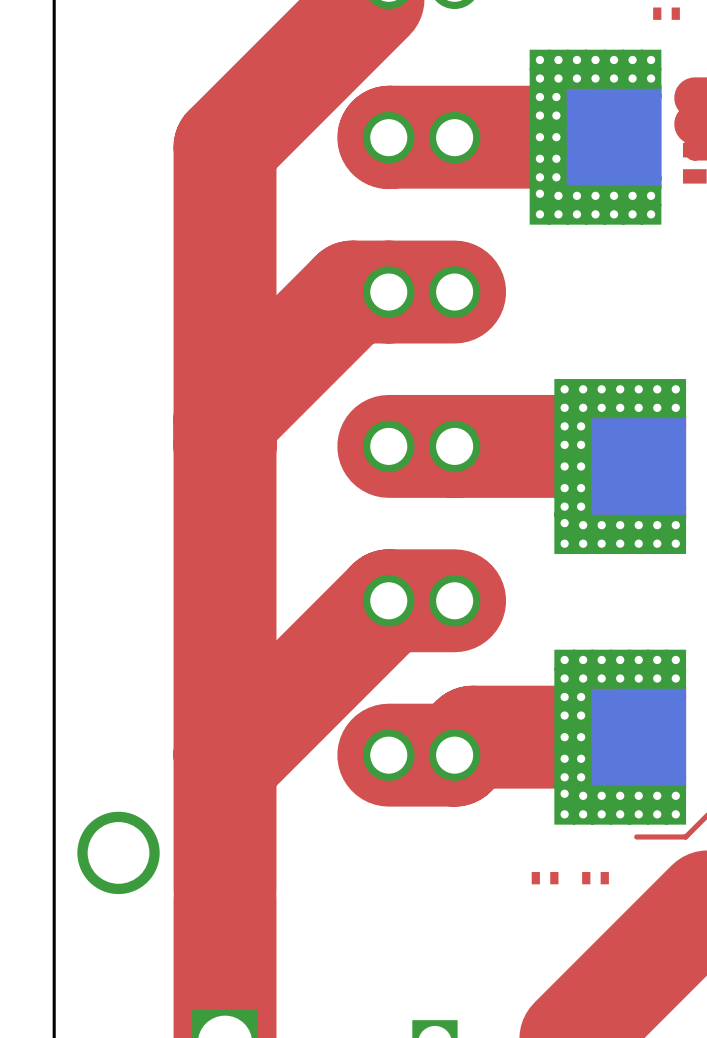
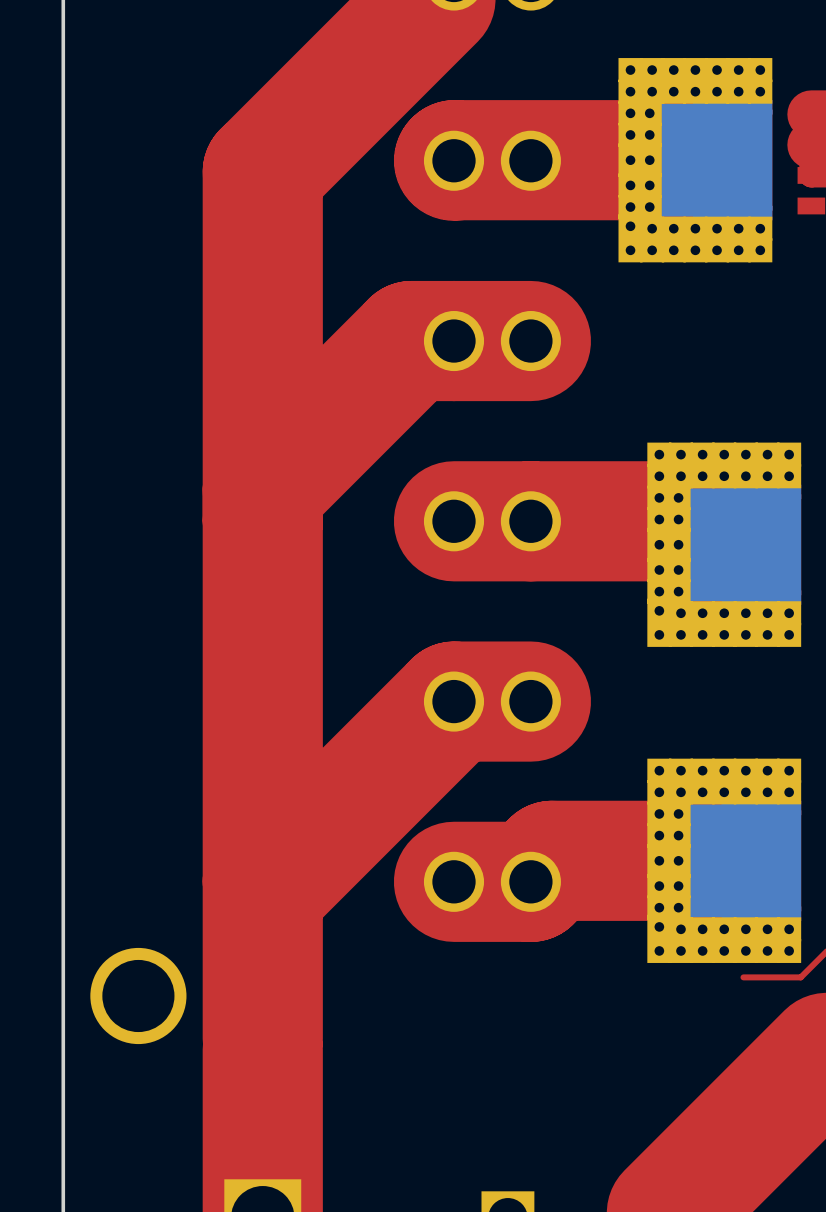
part: (666, 13) -> none
part: (545, 878) -> none
part: (595, 878) -> none

